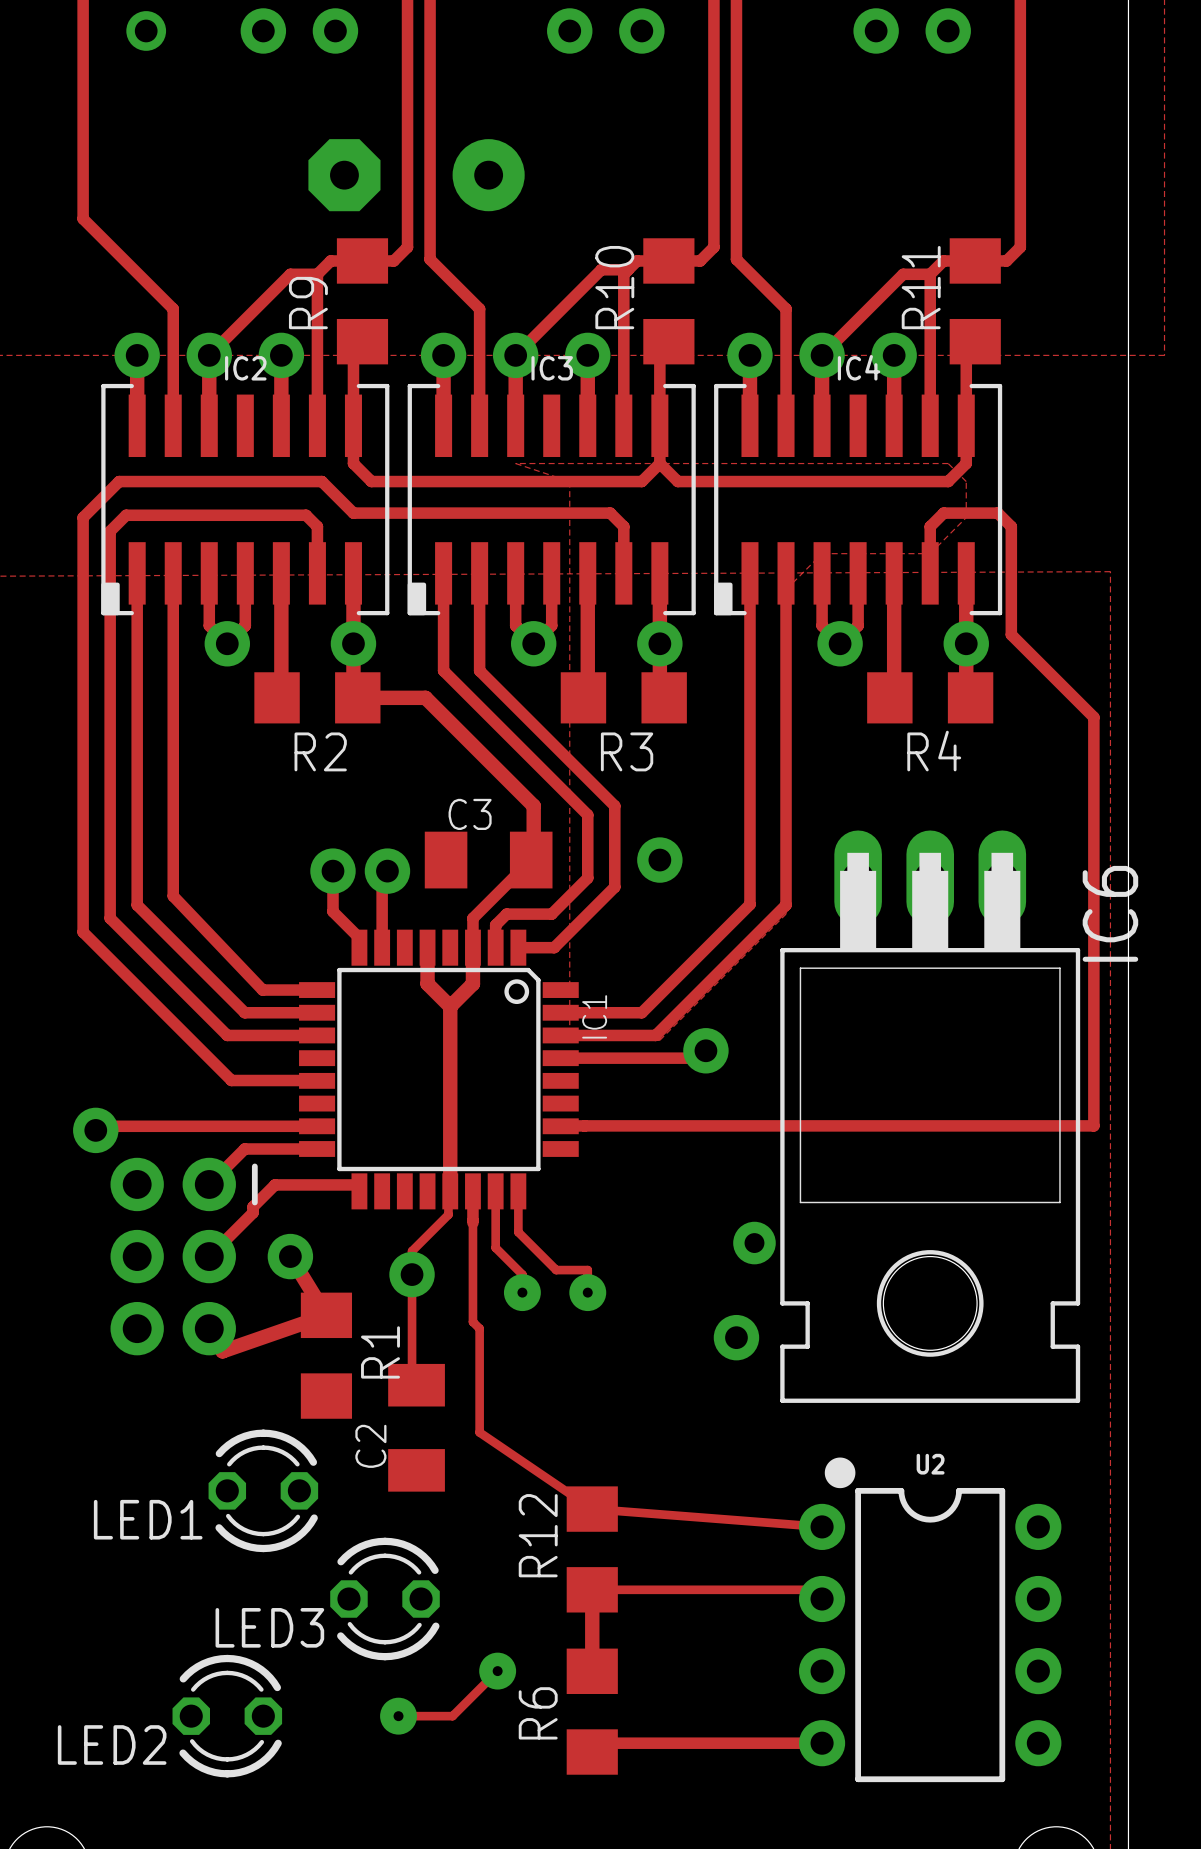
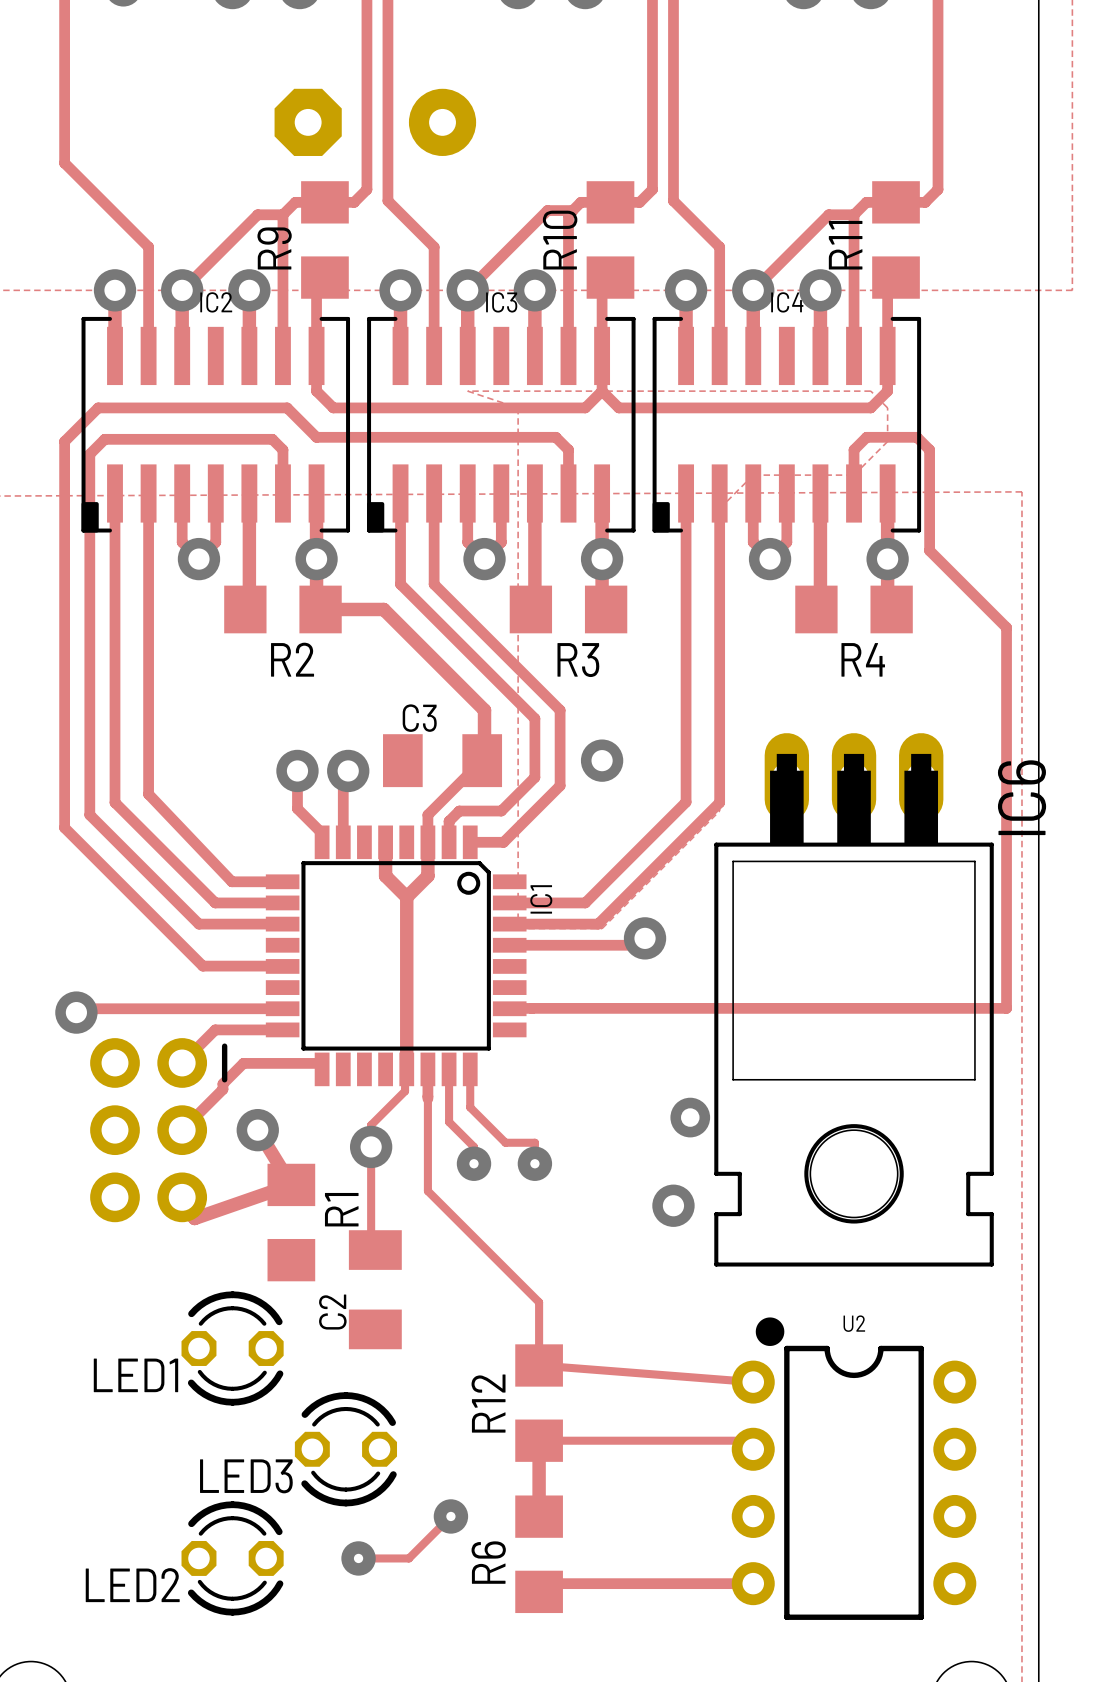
track: (479, 1328) (479, 1432) (592, 1509) -> (434, 1197) (539, 1302) (539, 1365)
LED2 position: (227, 1716) -> (232, 1558)

